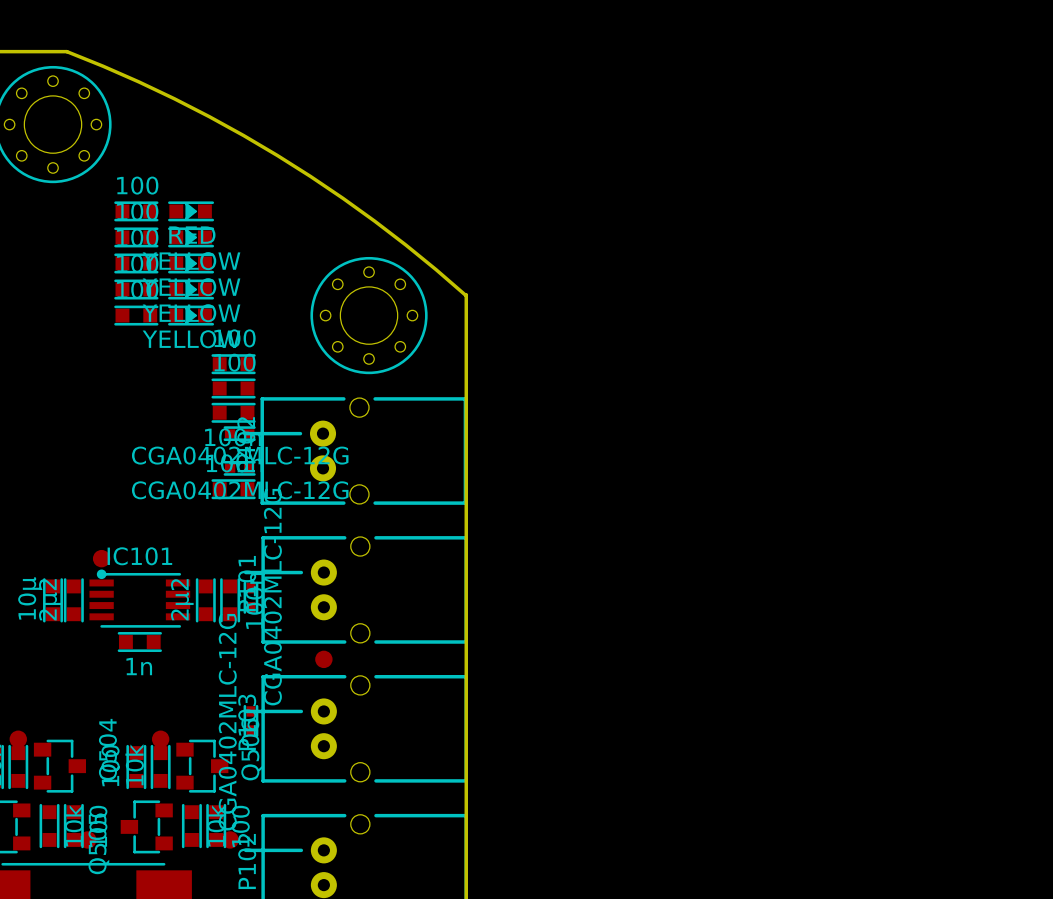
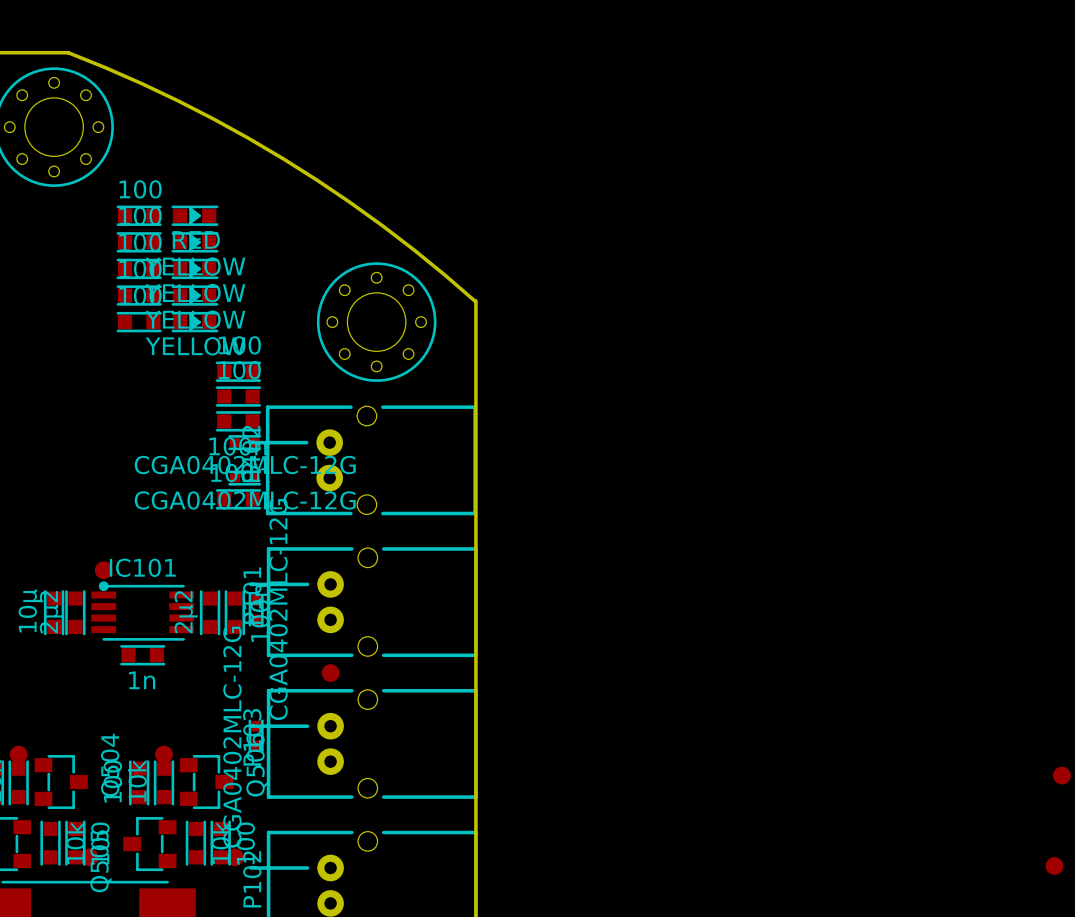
part: none -> (1061, 775)
part: none -> (1054, 865)

